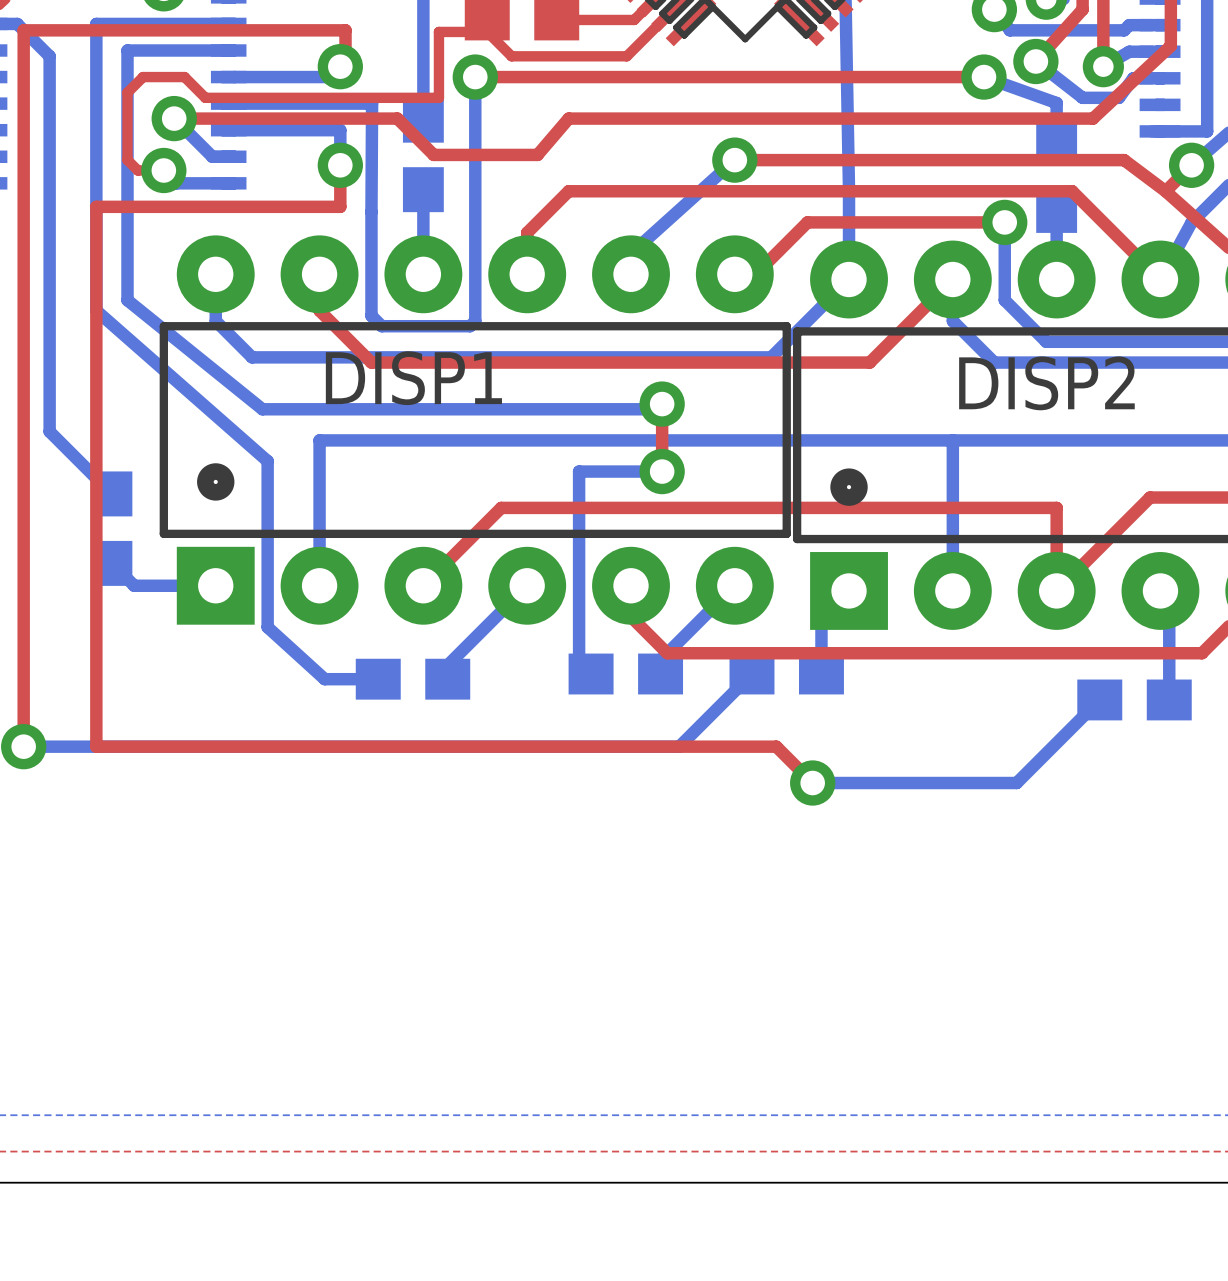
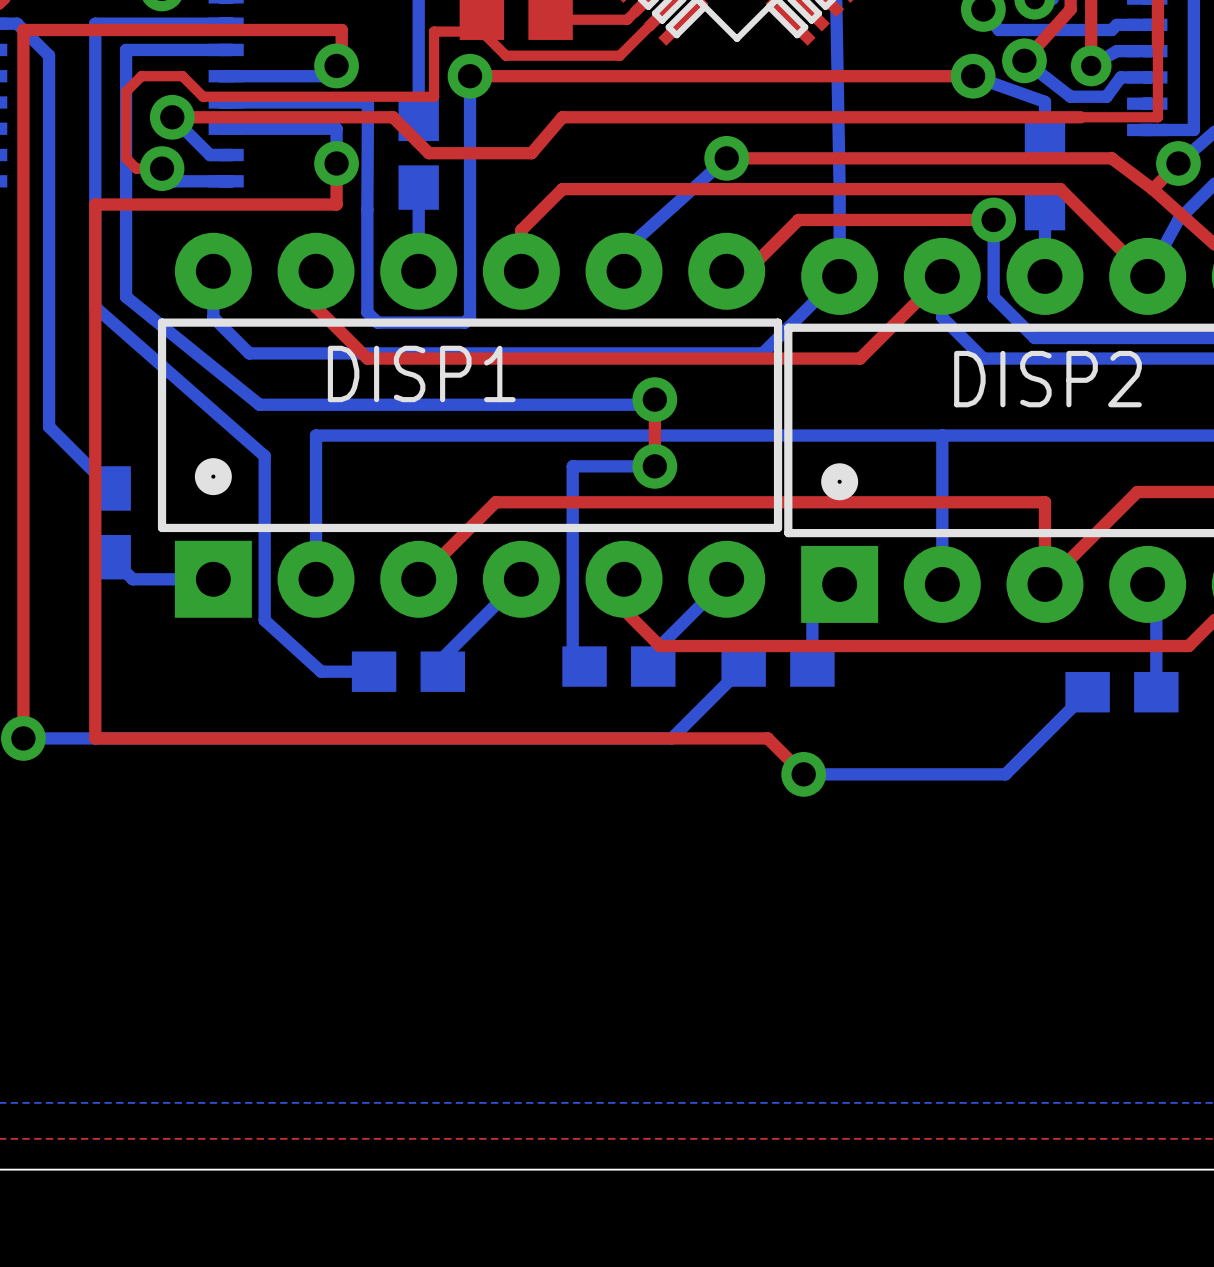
top track: (1170, 45) (1092, 118) -> (1157, 45) (1157, 117) (1080, 117)

